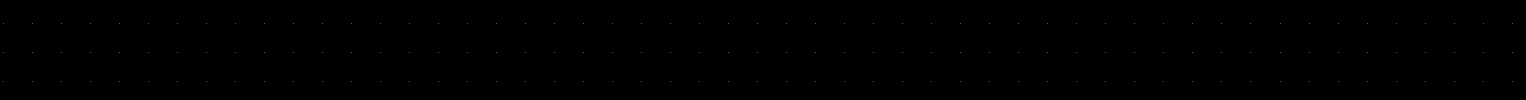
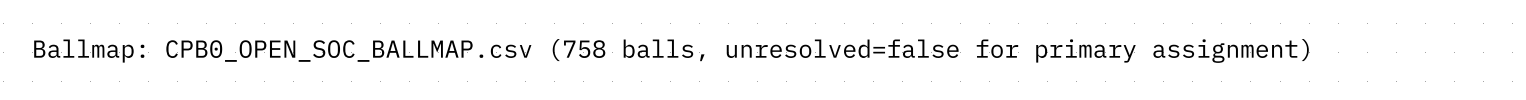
text: none -> Ballmap: CPB0_OPEN_SOC_BALLMAP.csv (758 balls, unresolved=false for primary assignment) (671, 50)

